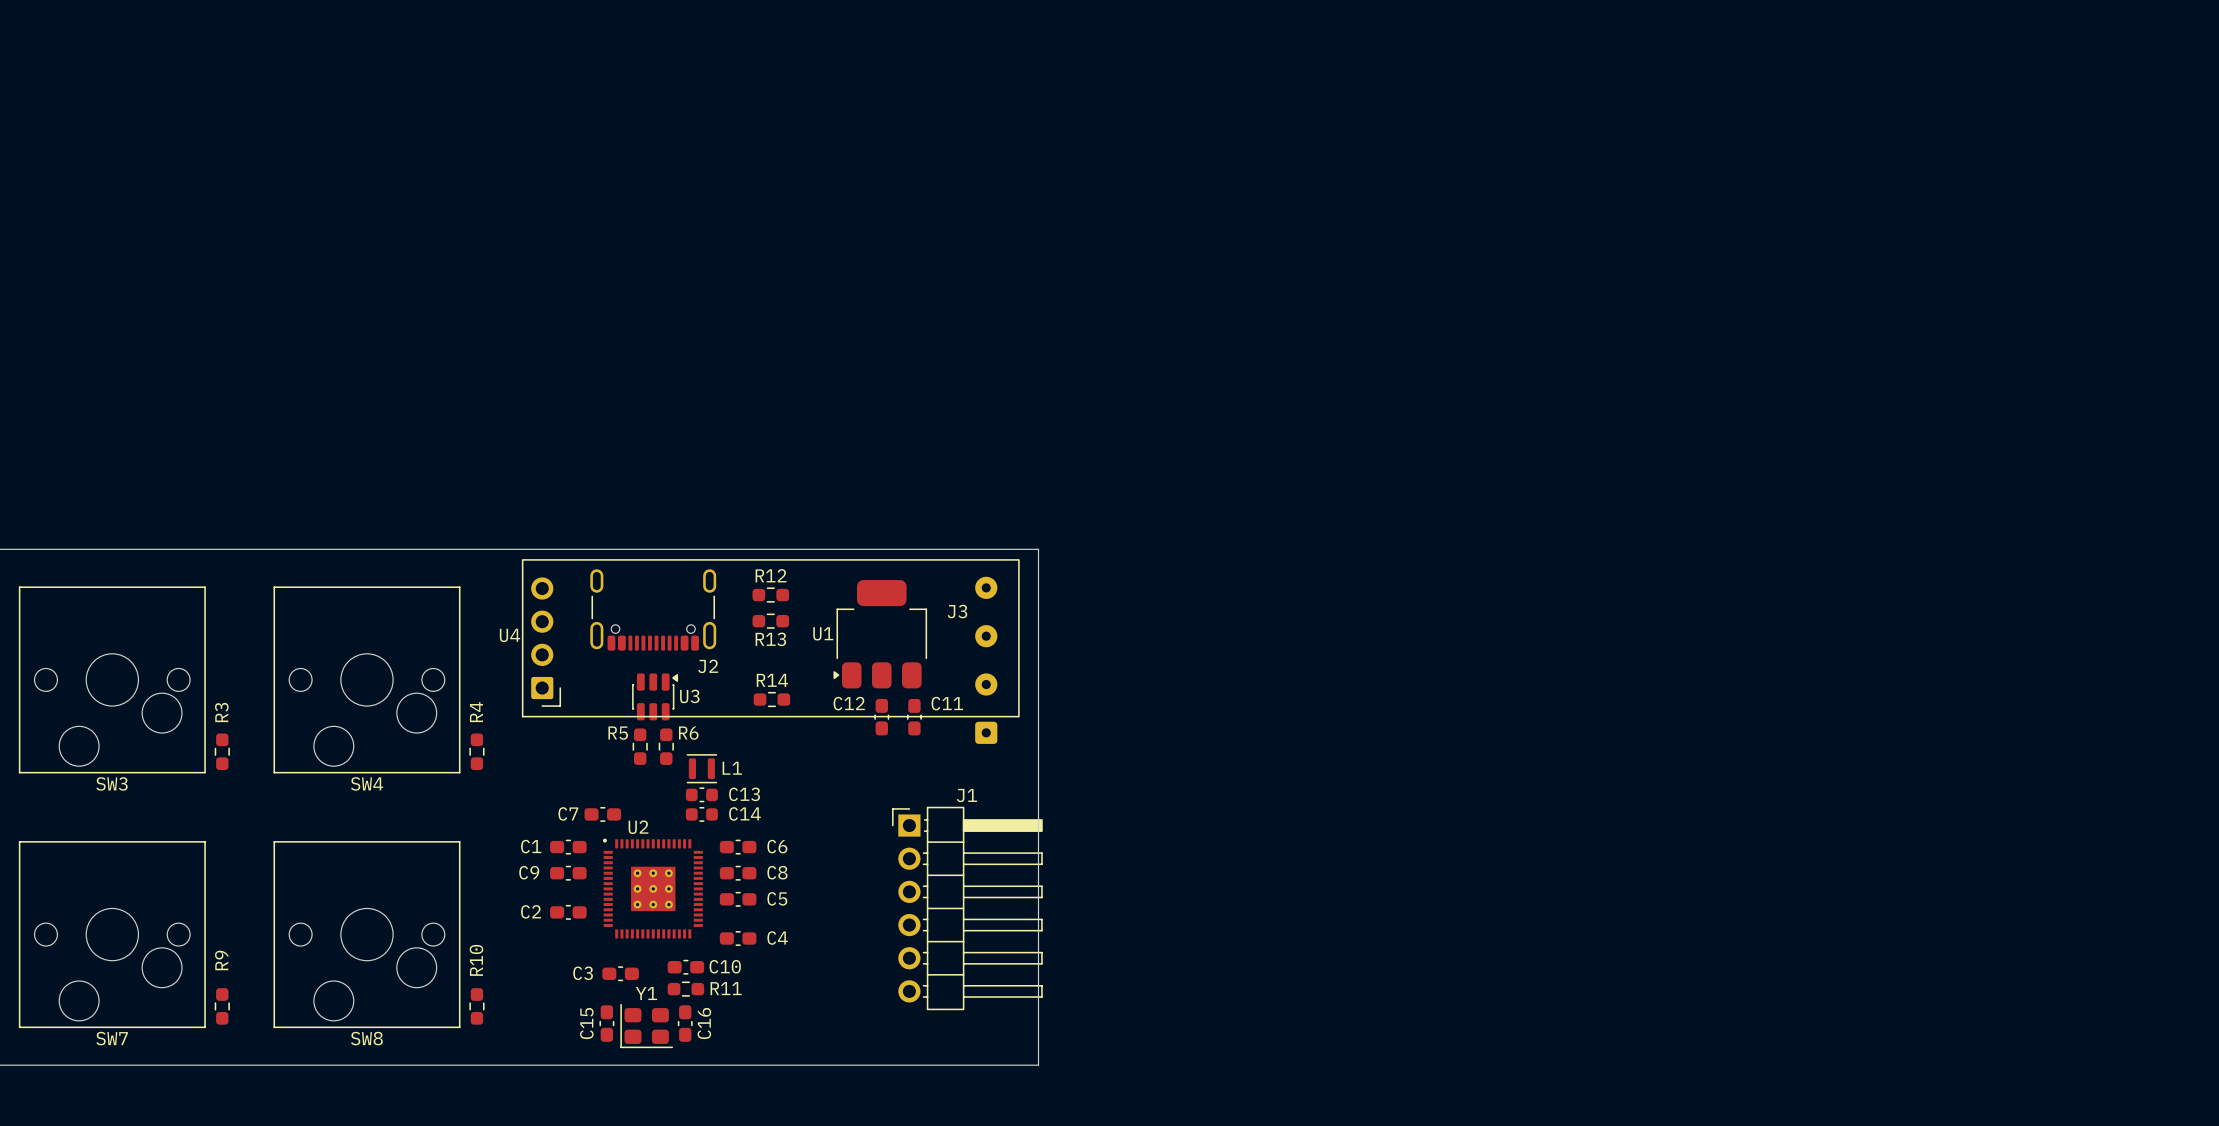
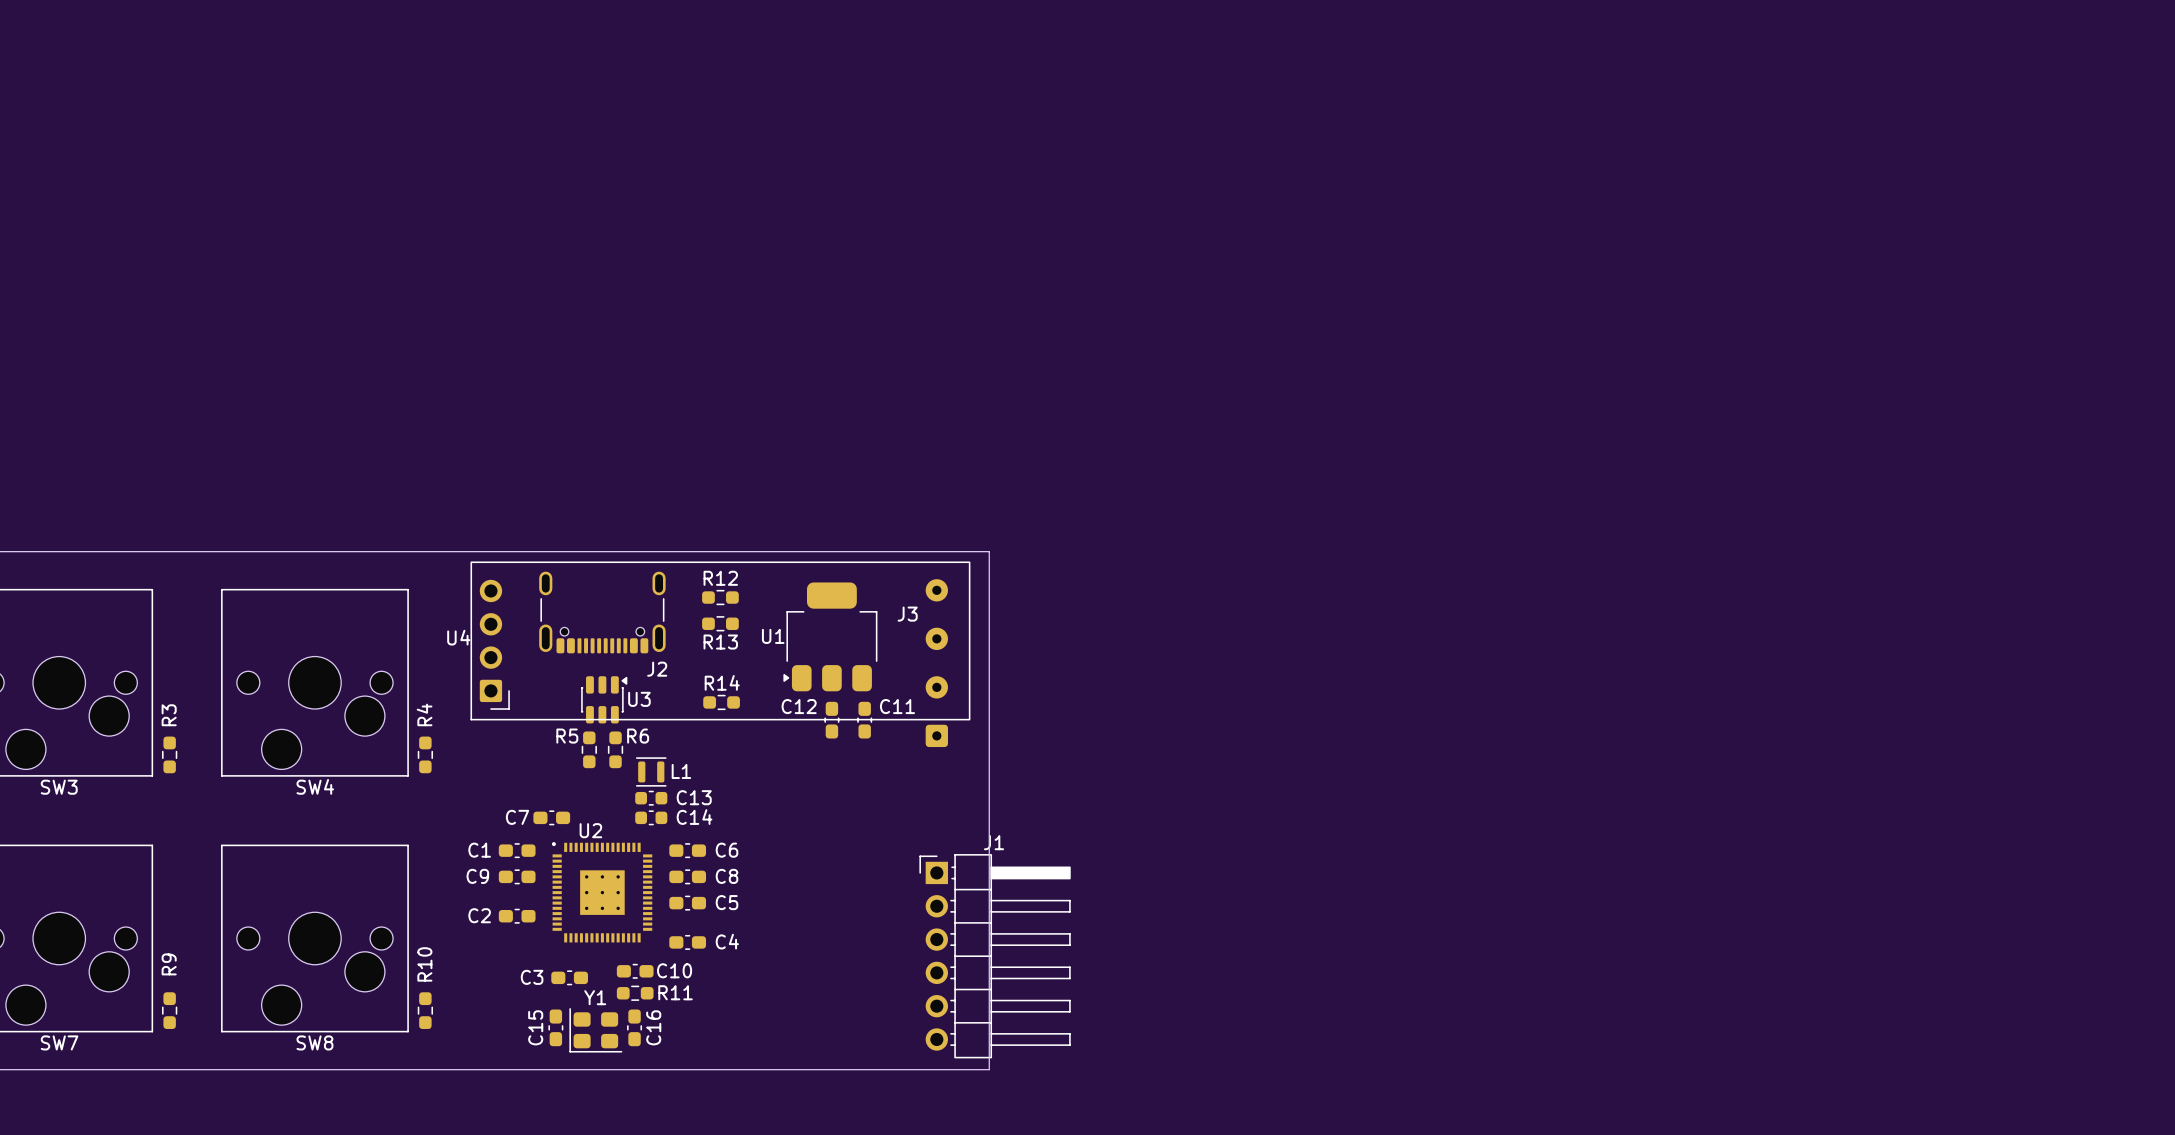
J1 position: (967, 908) -> (995, 956)

